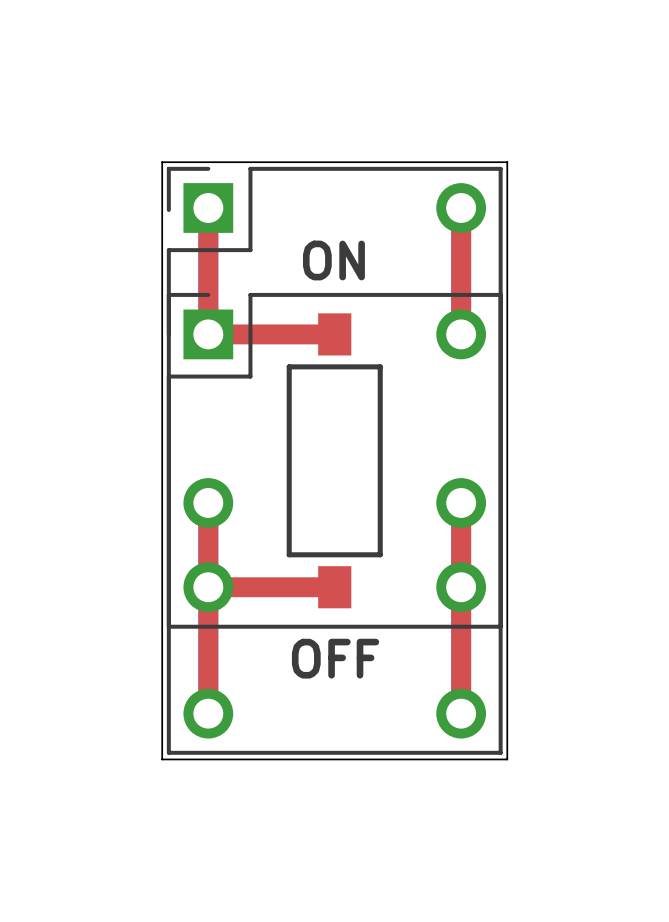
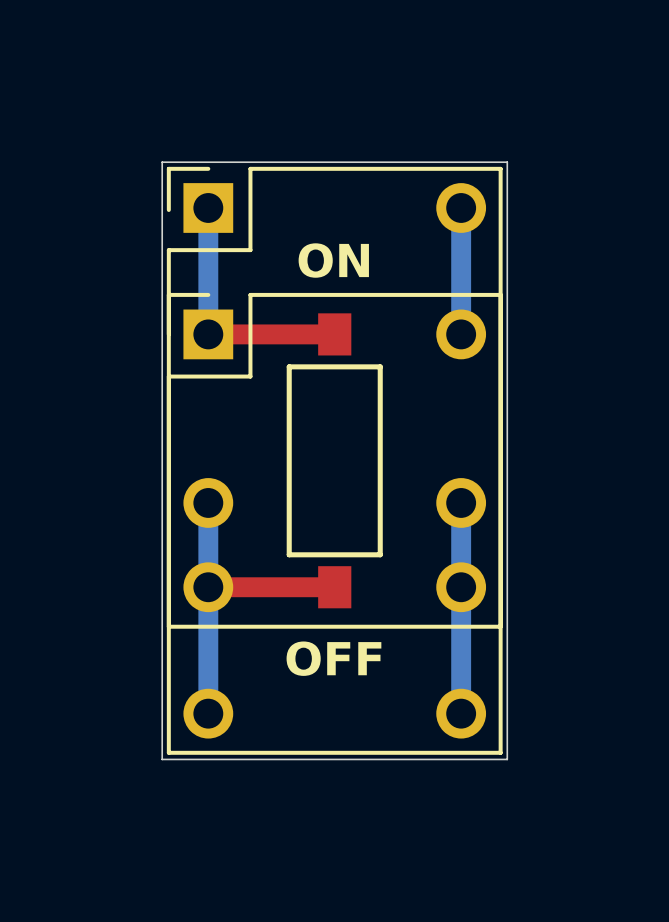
top track: (208, 207) (208, 334) -> none
top track: (461, 207) (461, 334) -> none
top track: (208, 502) (208, 713) -> none
top track: (461, 502) (461, 713) -> none

